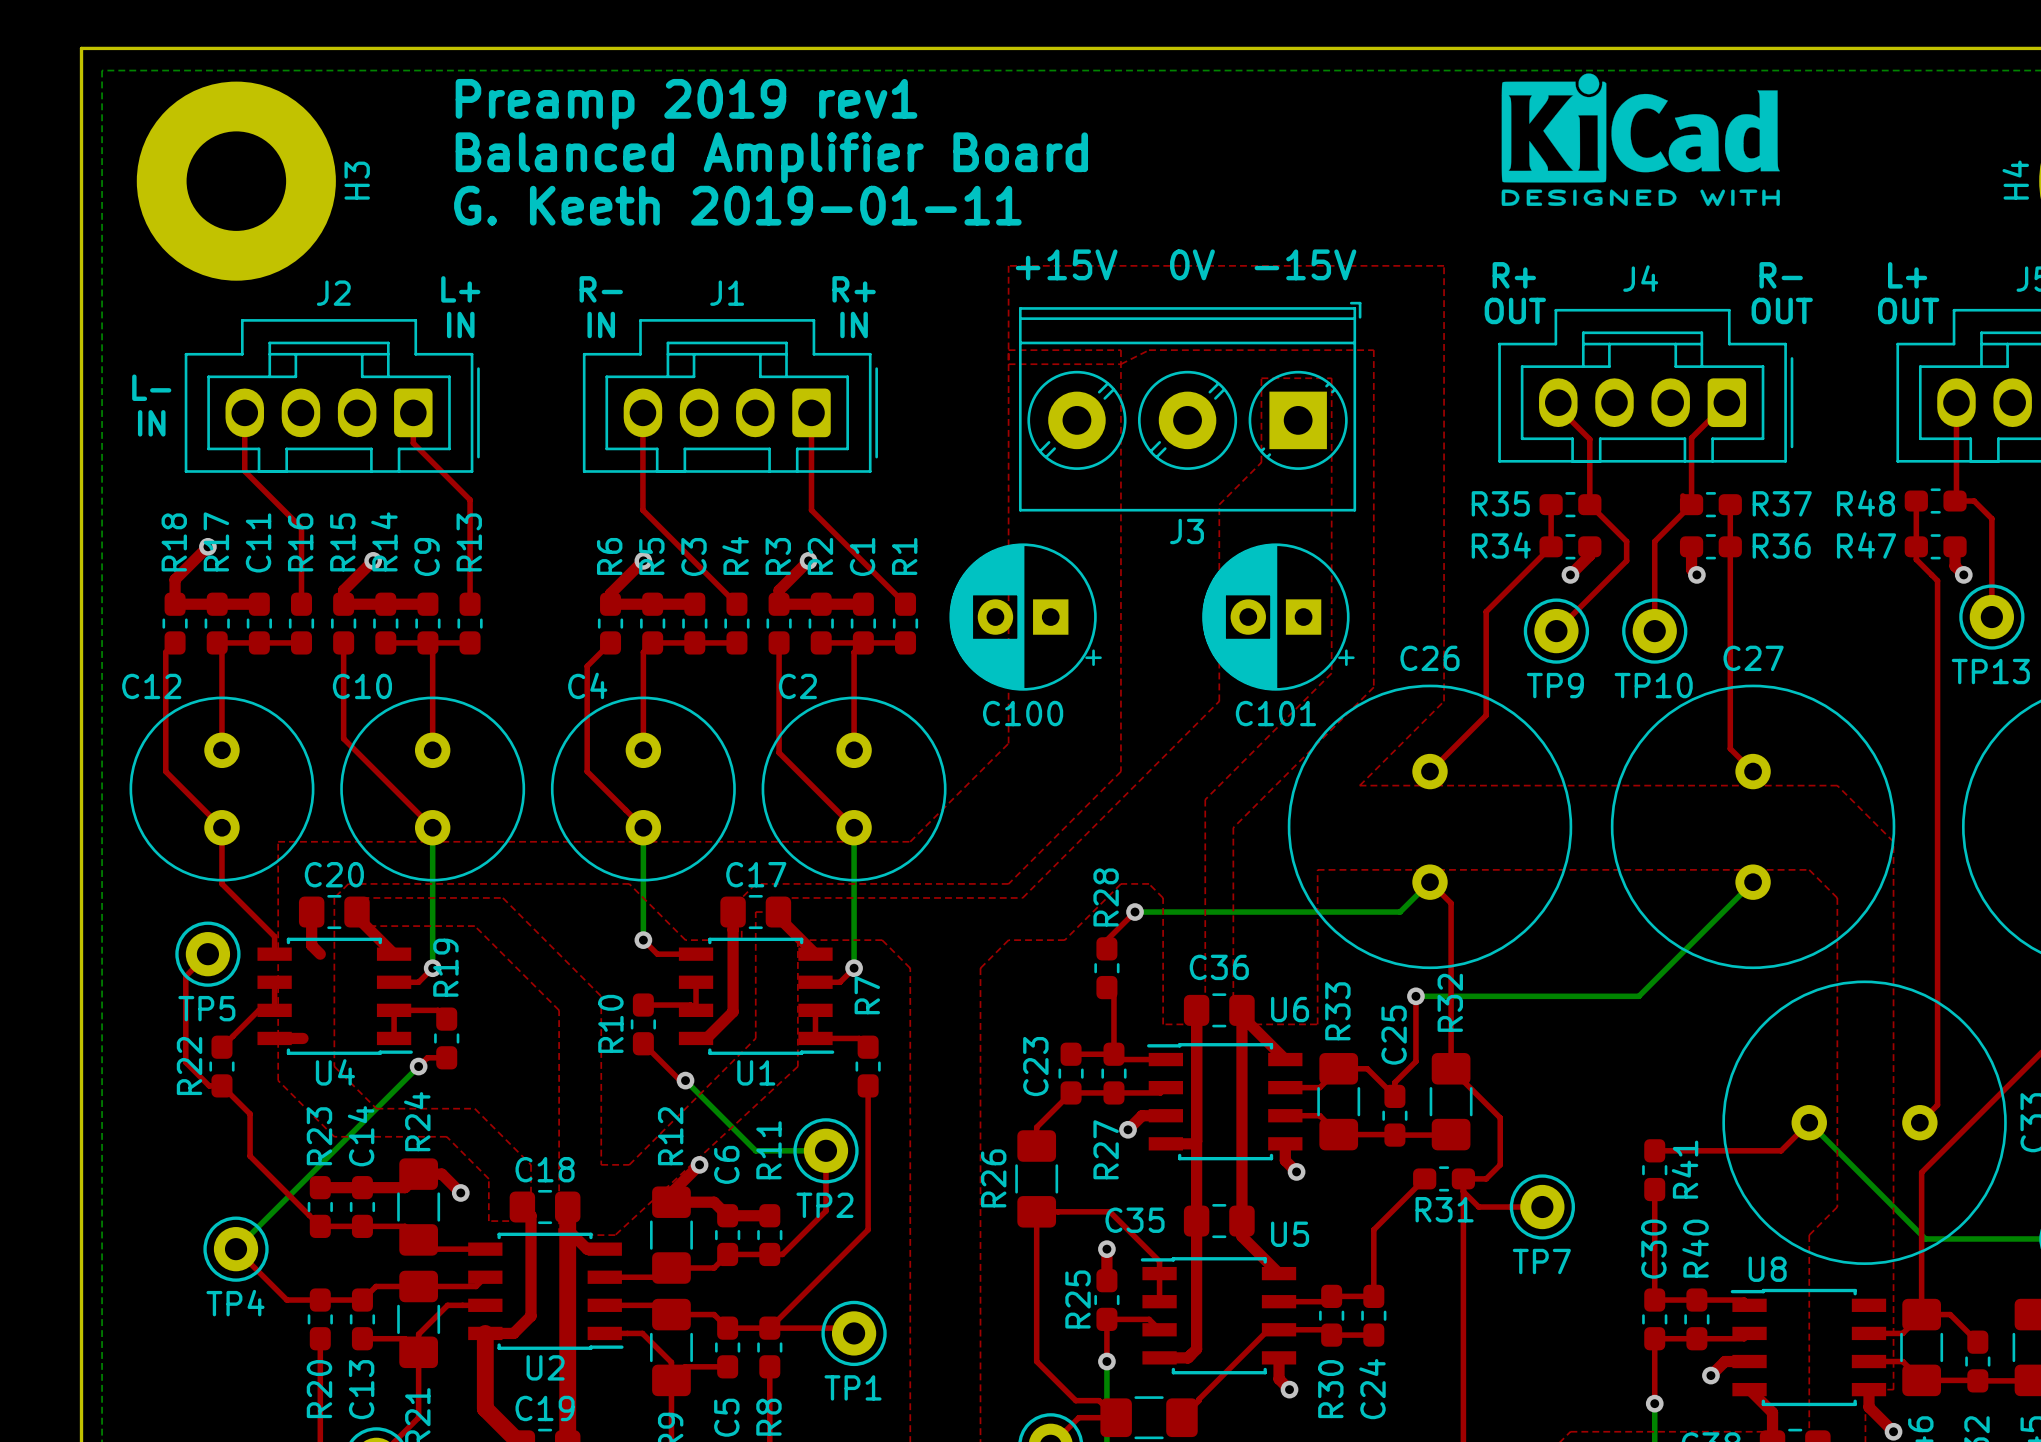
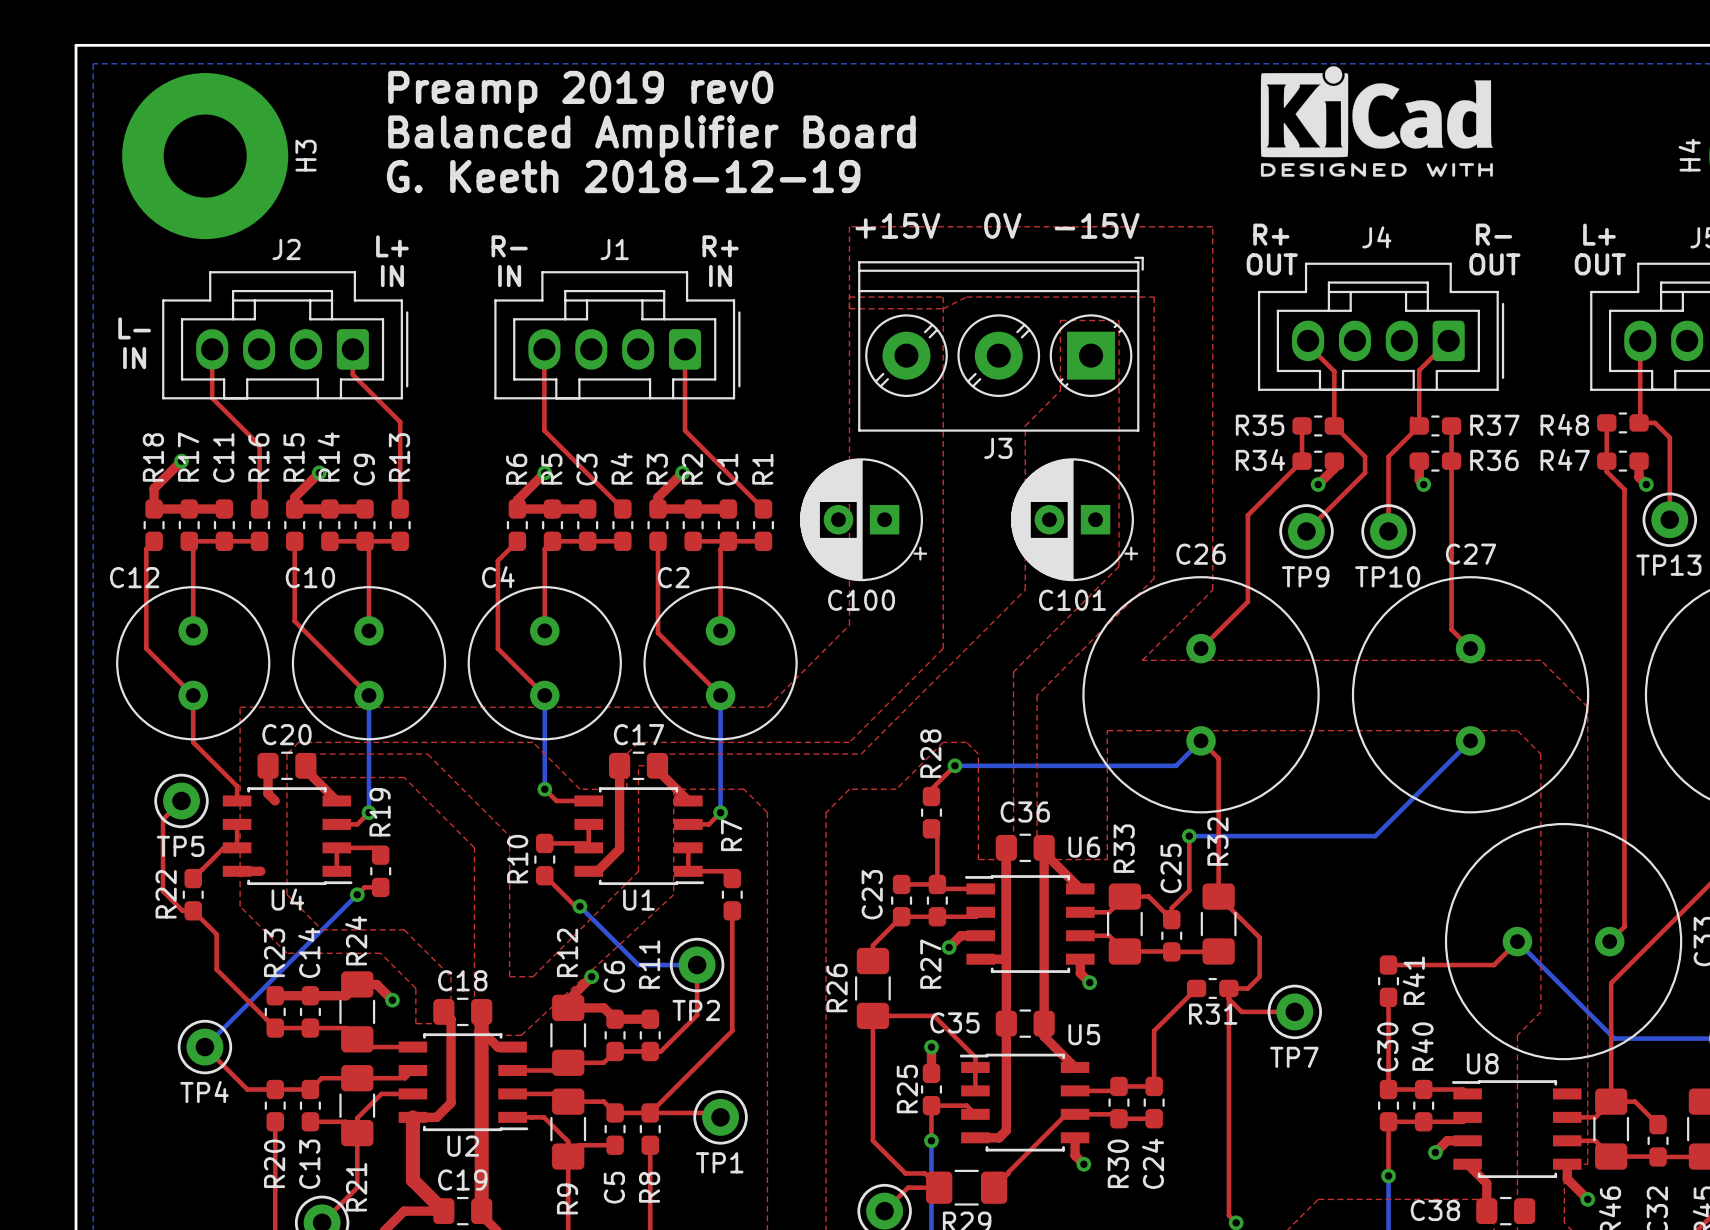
text: Preamp 2019 rev1 (686, 104) -> Preamp 2019 rev0 (580, 92)
text: G. Keeth 2019-01-11 (737, 205) -> G. Keeth 2018-12-19 (623, 176)

